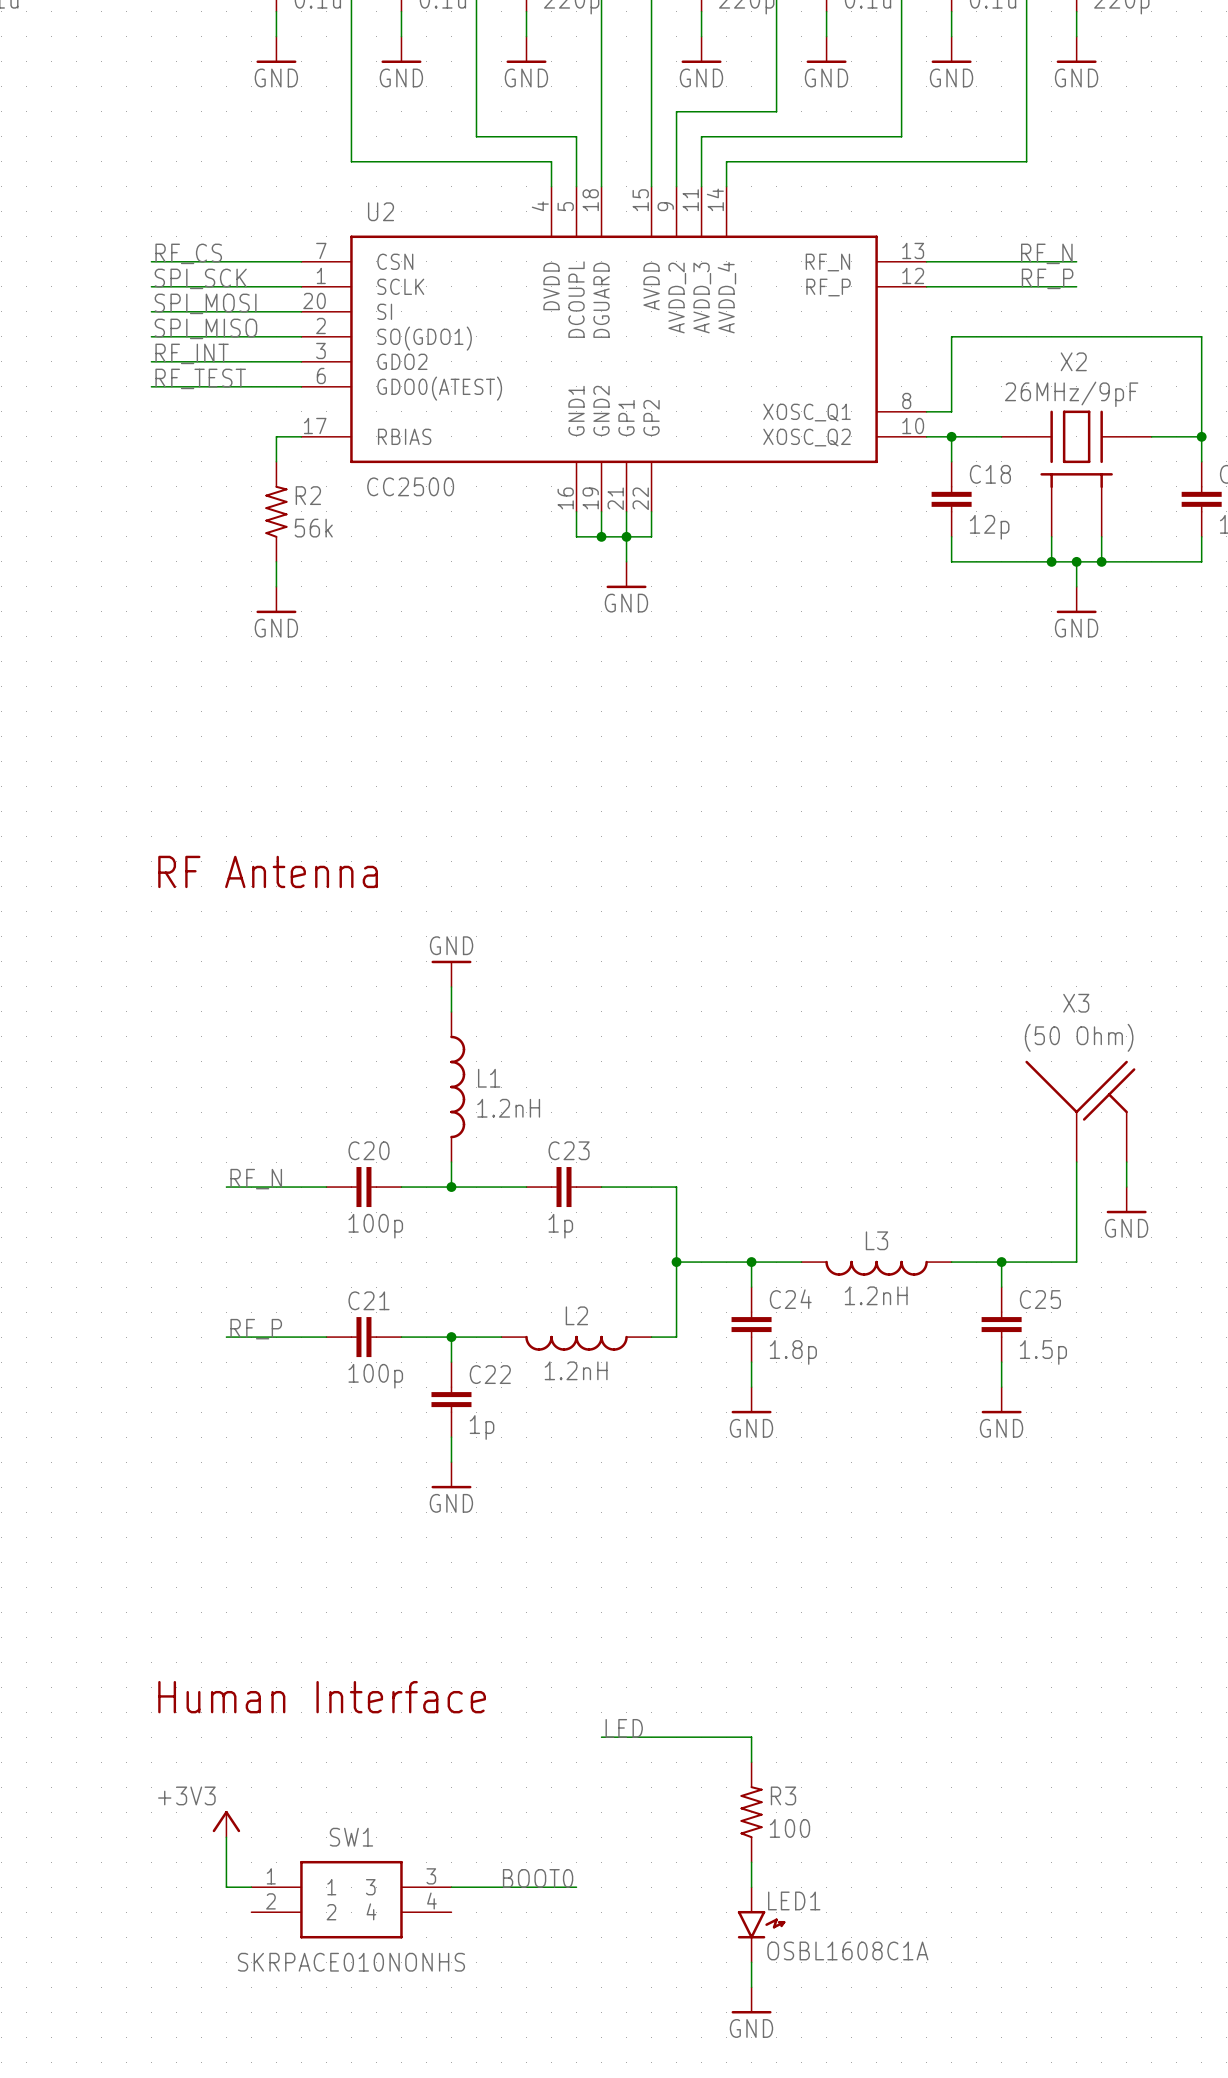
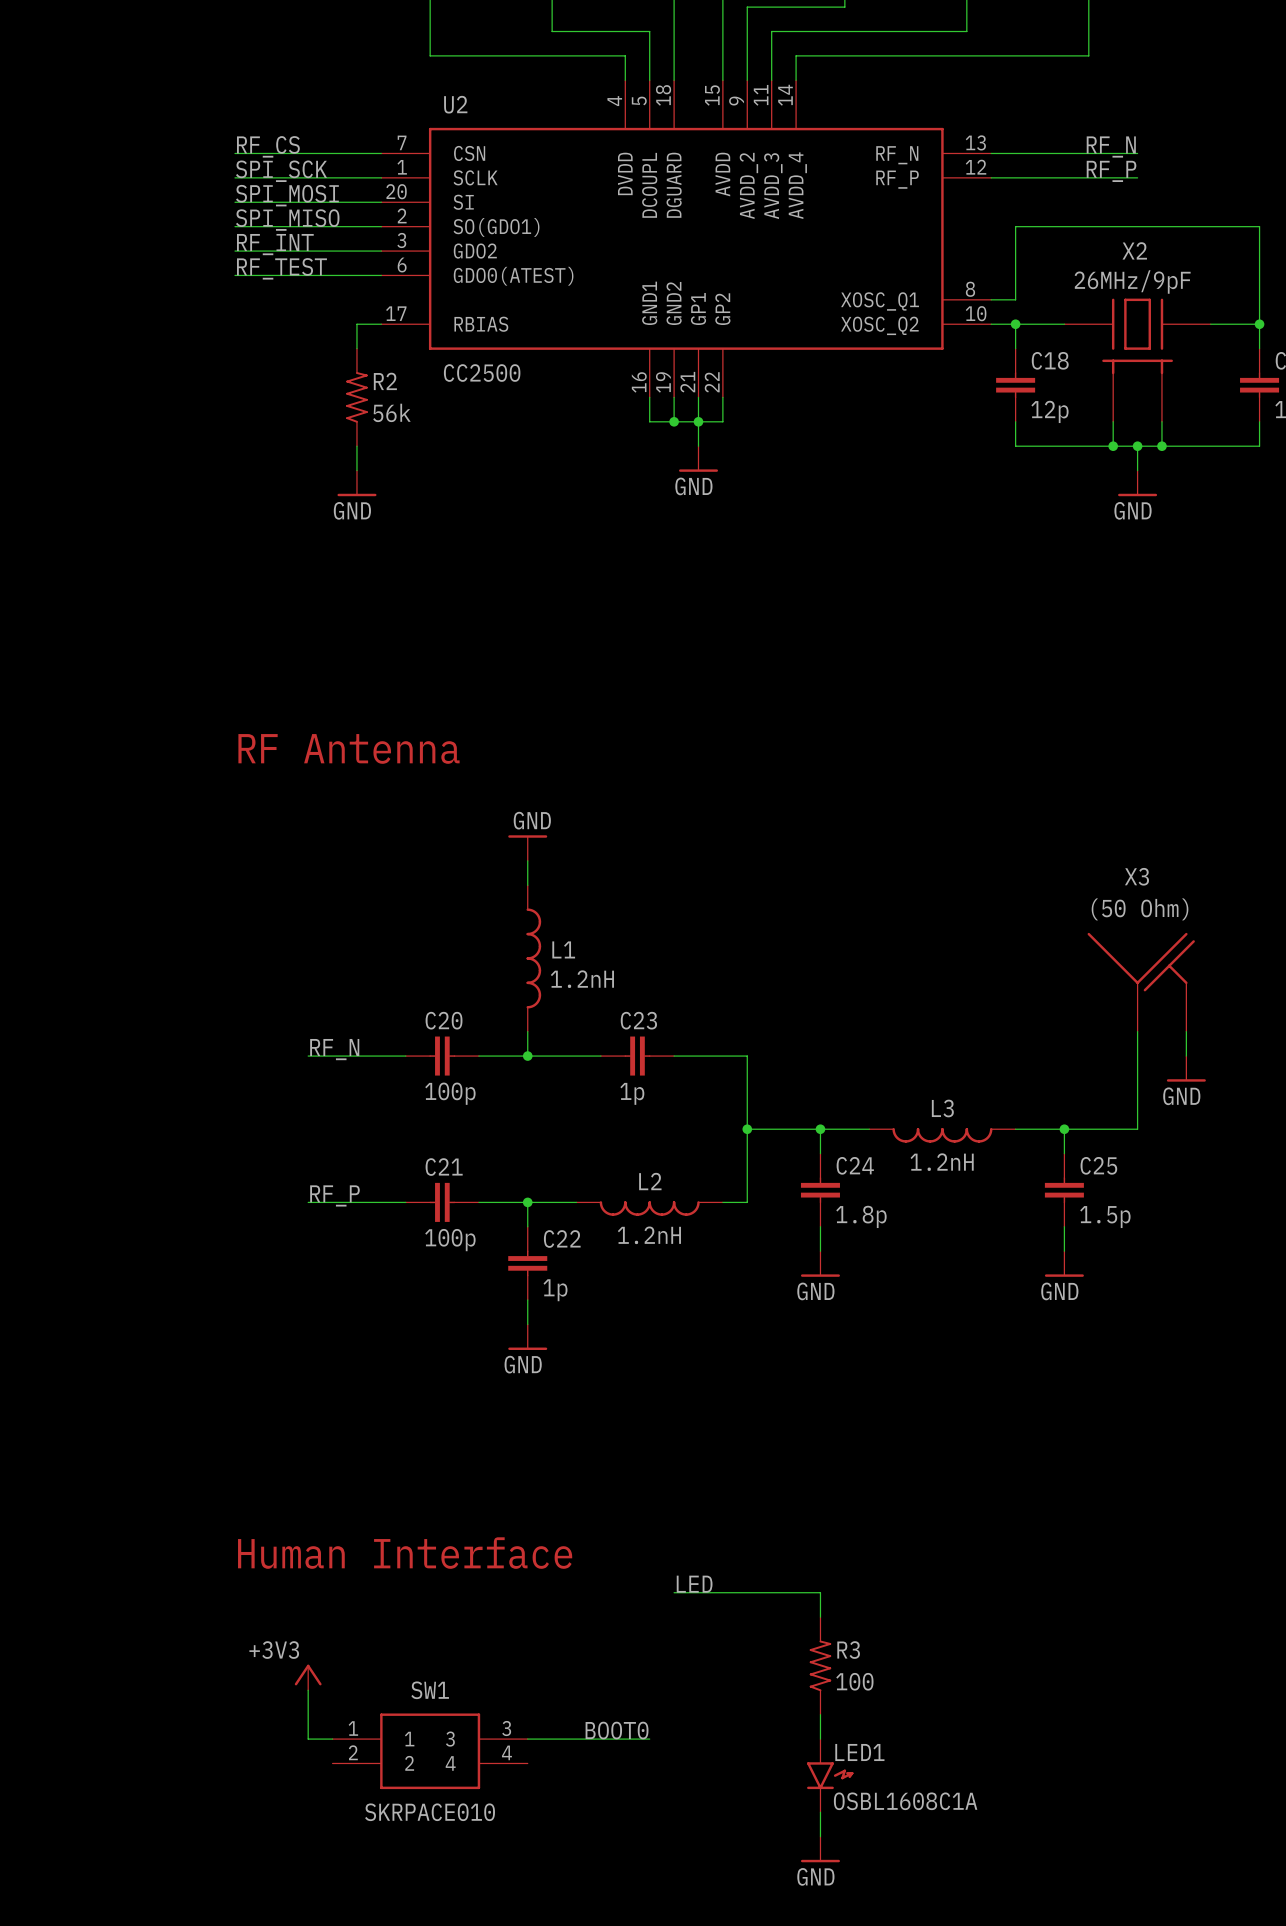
SW1 value: SKRPACE010NONHS (351, 1962) -> SKRPACE010 (430, 1812)

